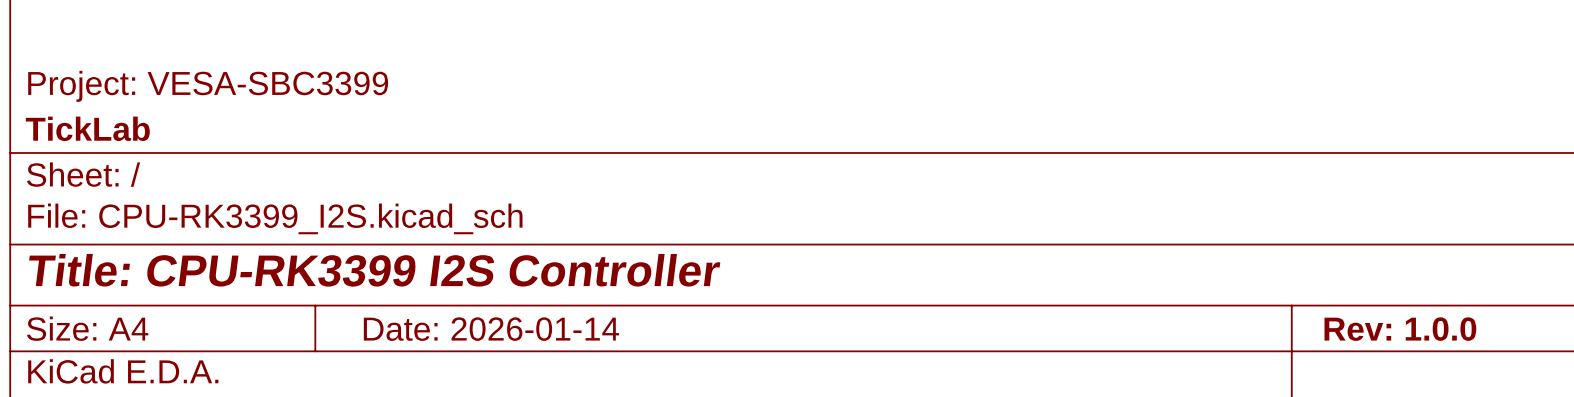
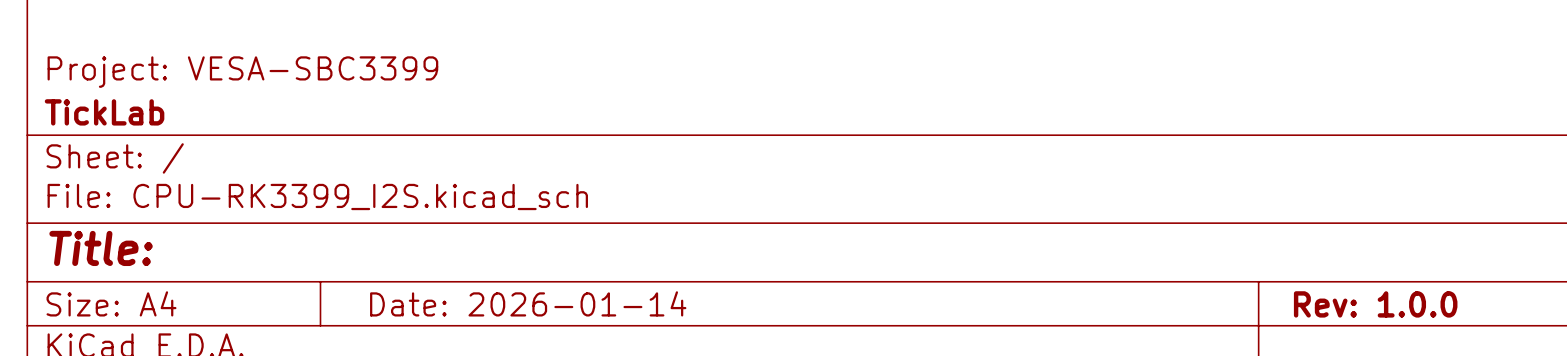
title block: Title: CPU-RK3399 I2S Controller (374, 270) -> Title: (101, 248)

